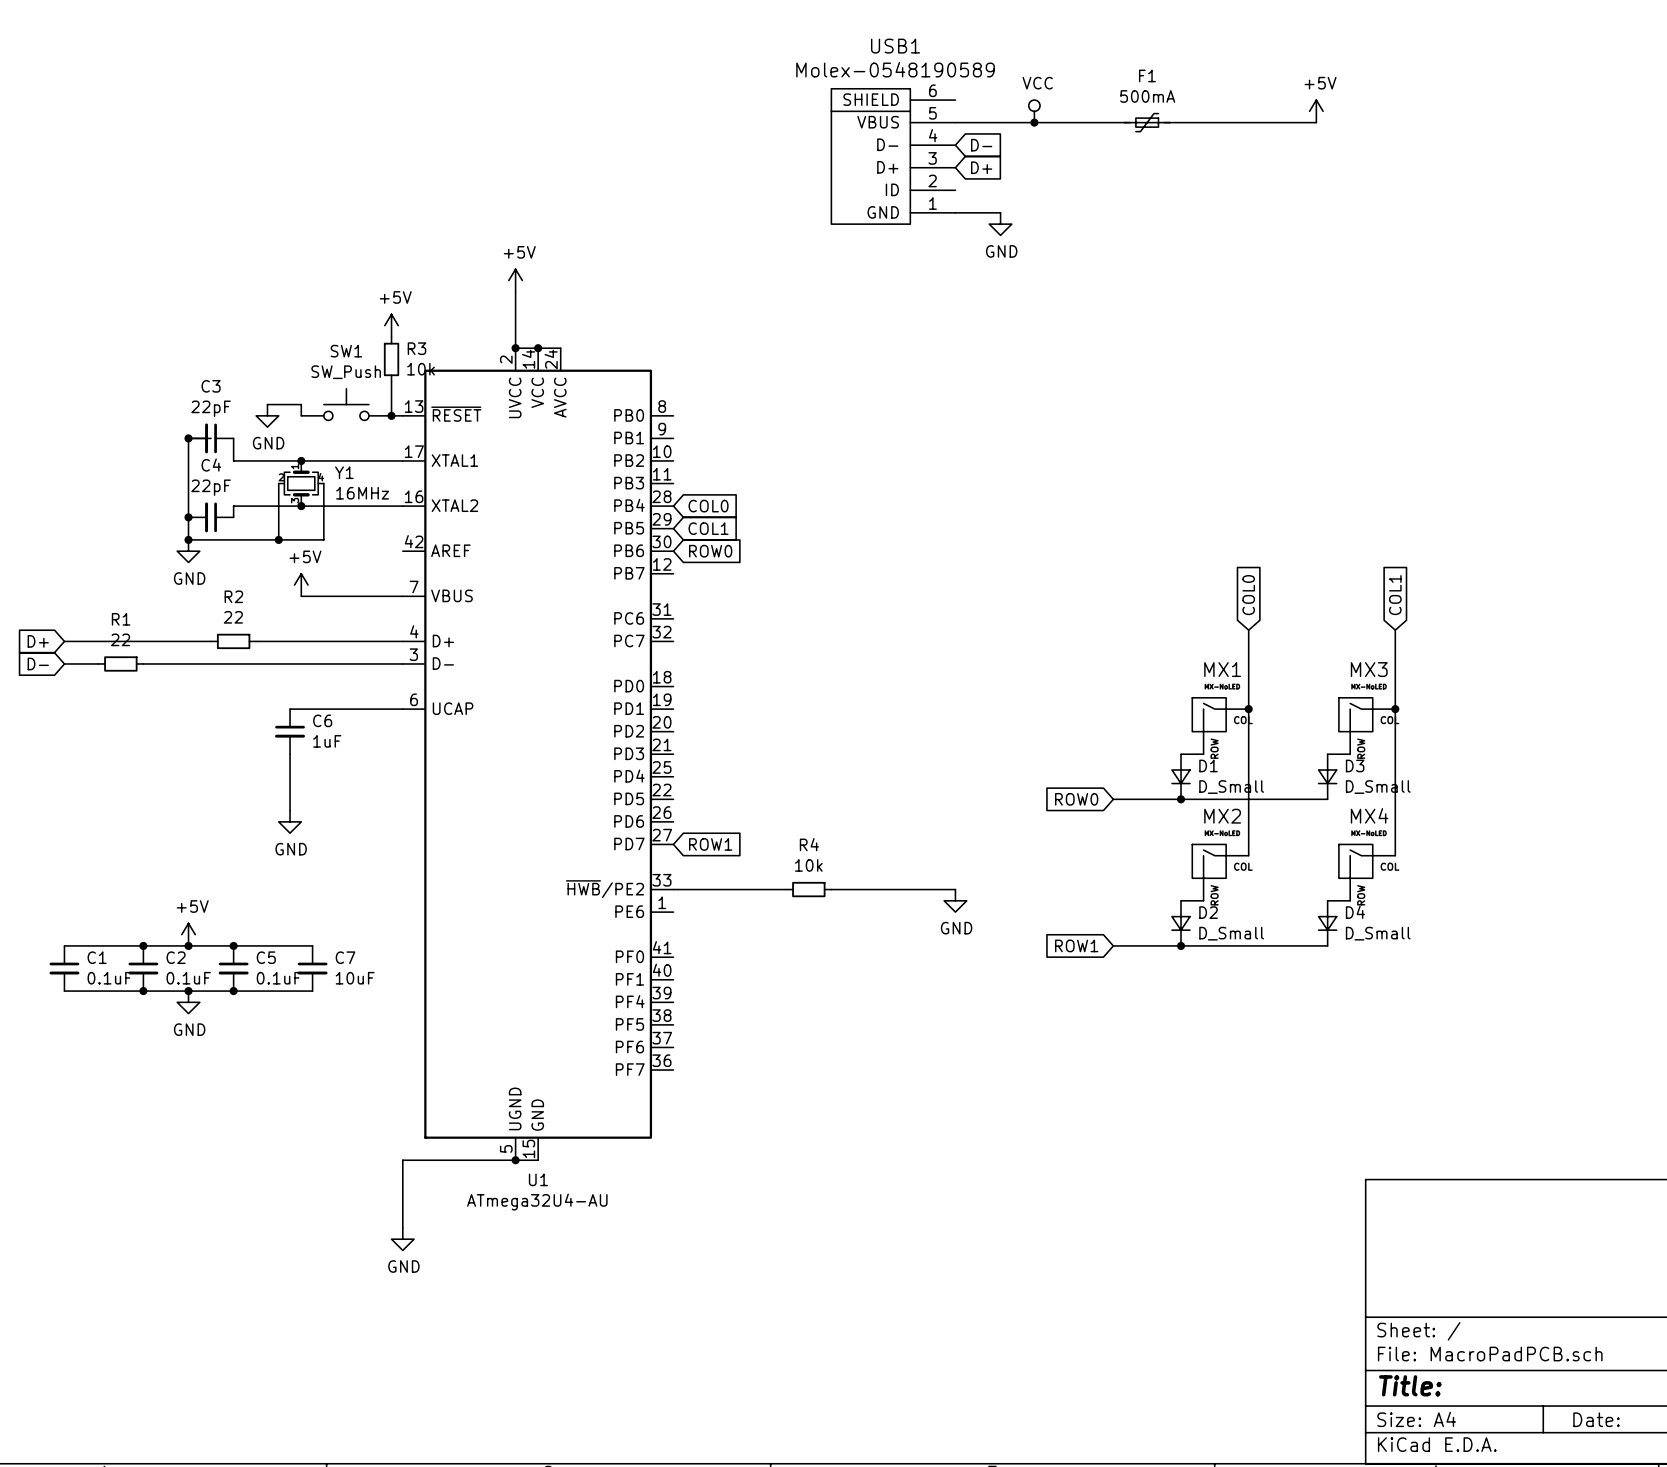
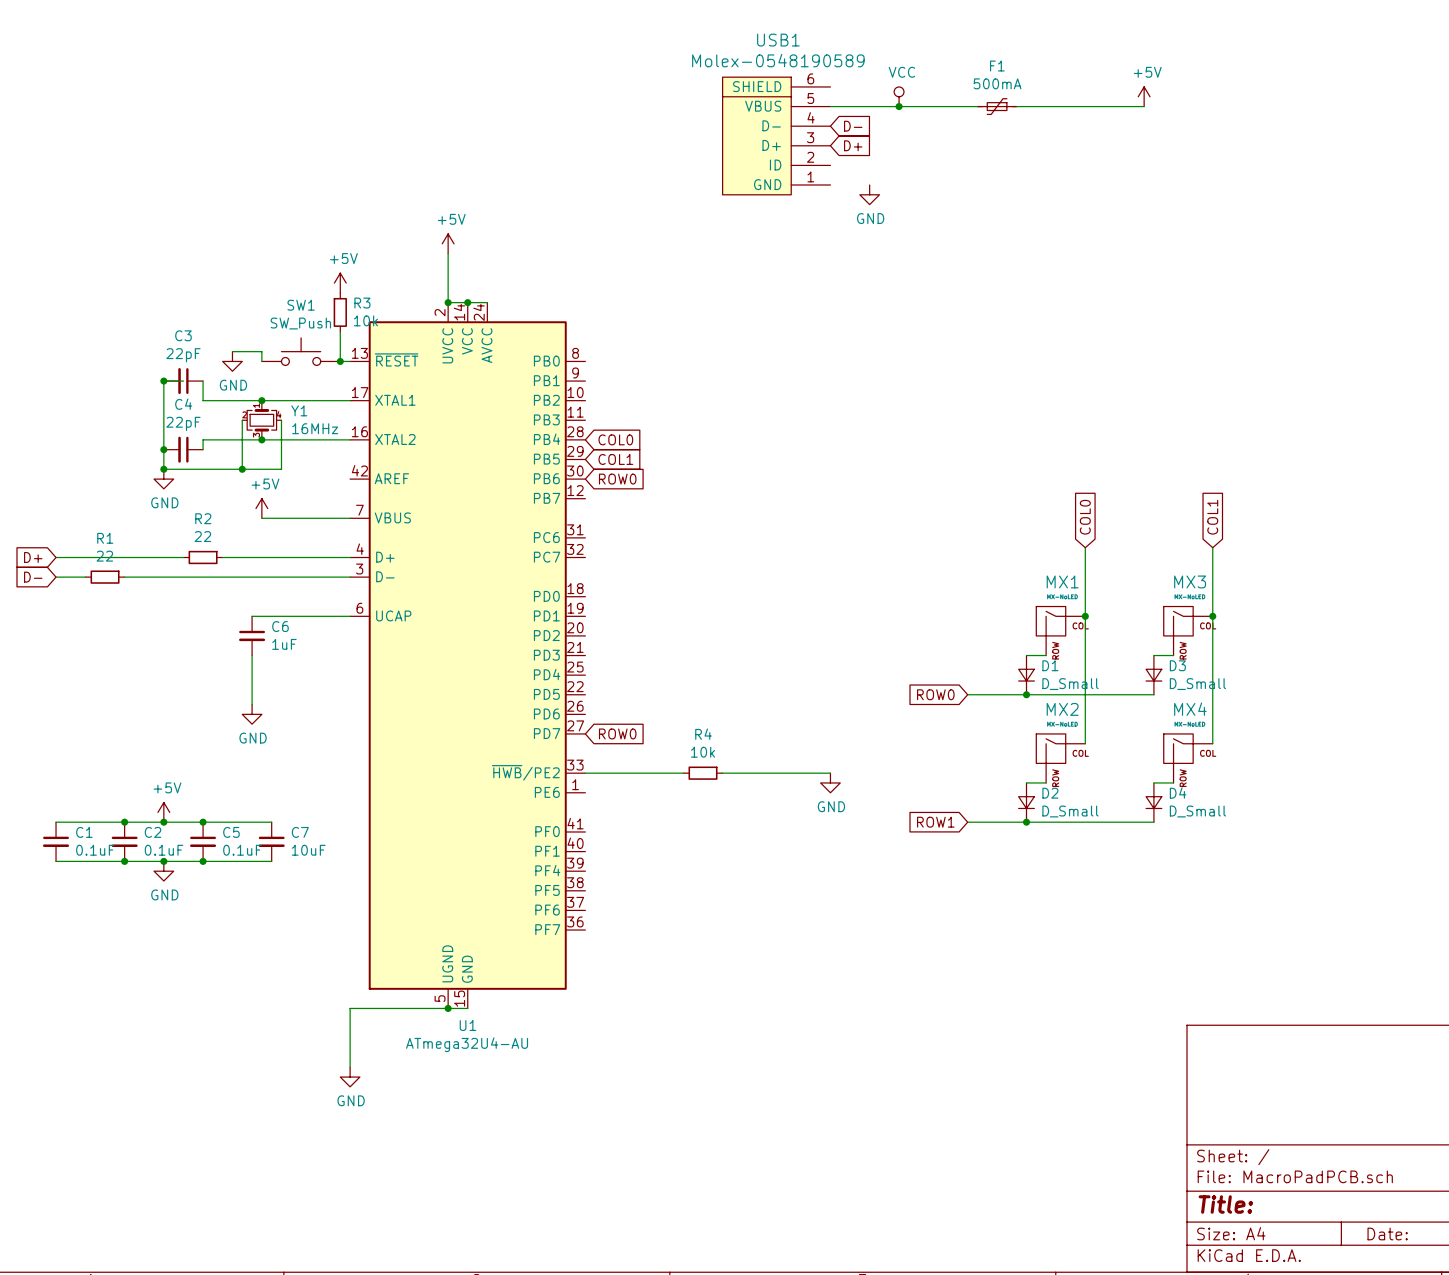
wire: (955, 212) (1000, 212) -> none
global label: ROW1 (710, 844) -> ROW0 (617, 733)

